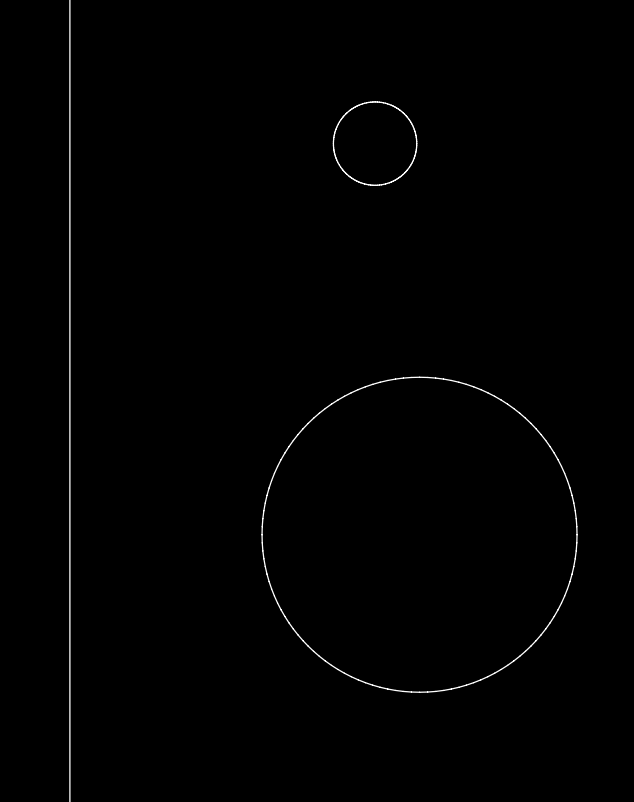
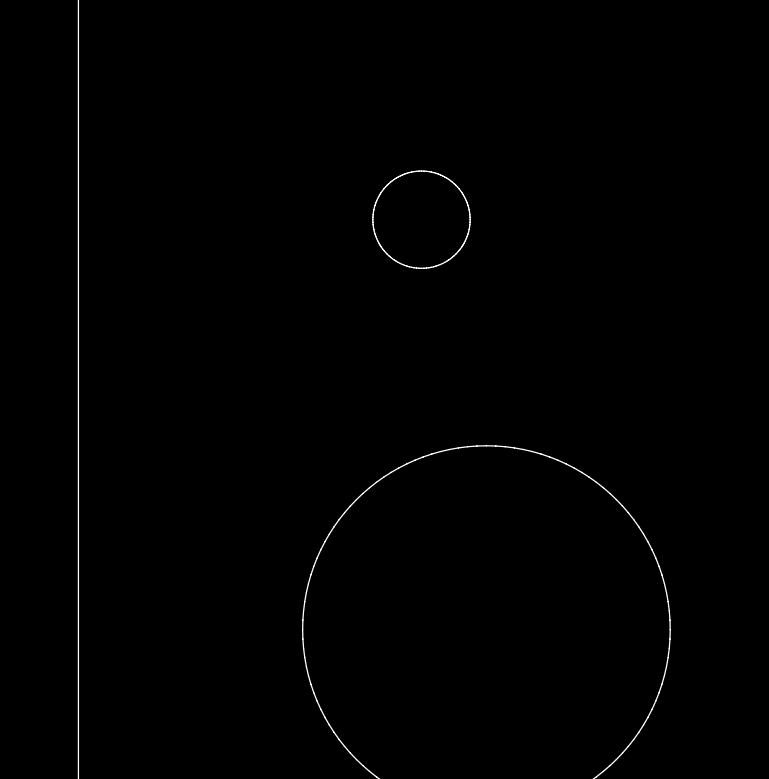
board edge: (372, 101) (357, 106) (344, 115) (335, 129) (333, 145) (337, 161) (347, 174) (360, 182) (377, 185) (393, 181) (405, 171) (414, 157) (416, 141) (412, 125) (403, 112) (389, 104) (372, 101) -> (418, 171) (400, 175) (385, 186) (375, 202) (372, 222) (377, 240) (388, 255) (404, 265) (423, 268) (442, 263) (457, 252) (467, 236) (470, 217) (465, 198) (454, 183) (438, 174) (418, 171)

